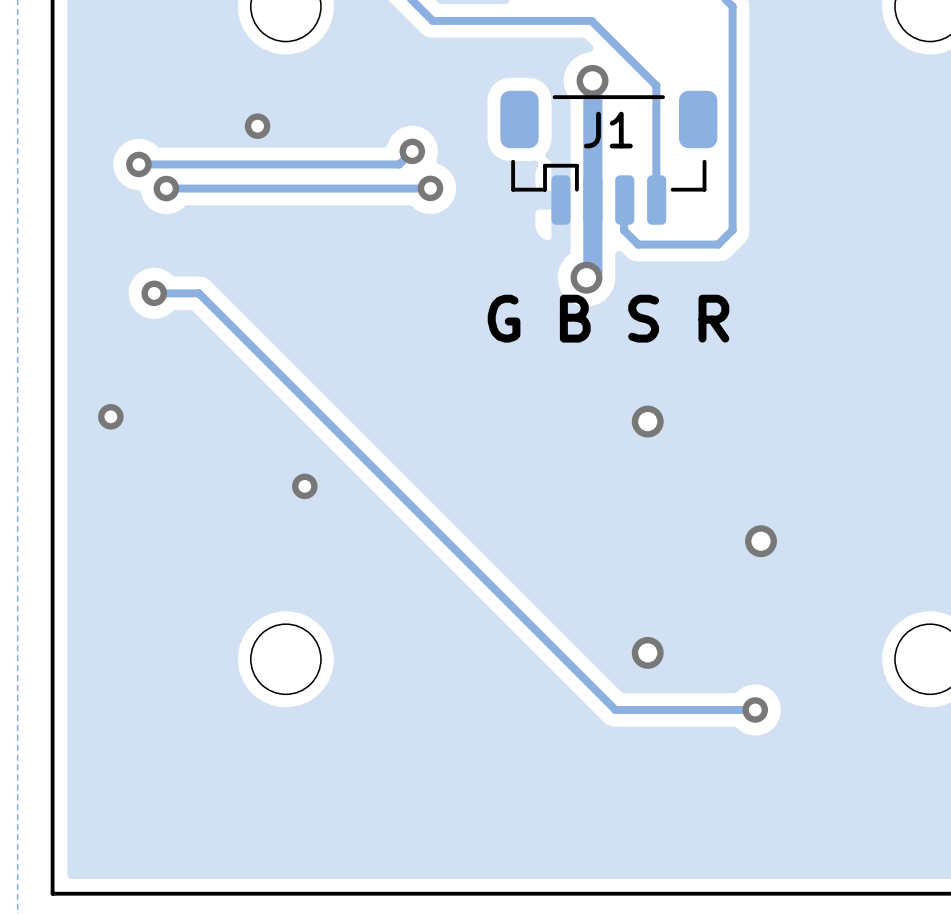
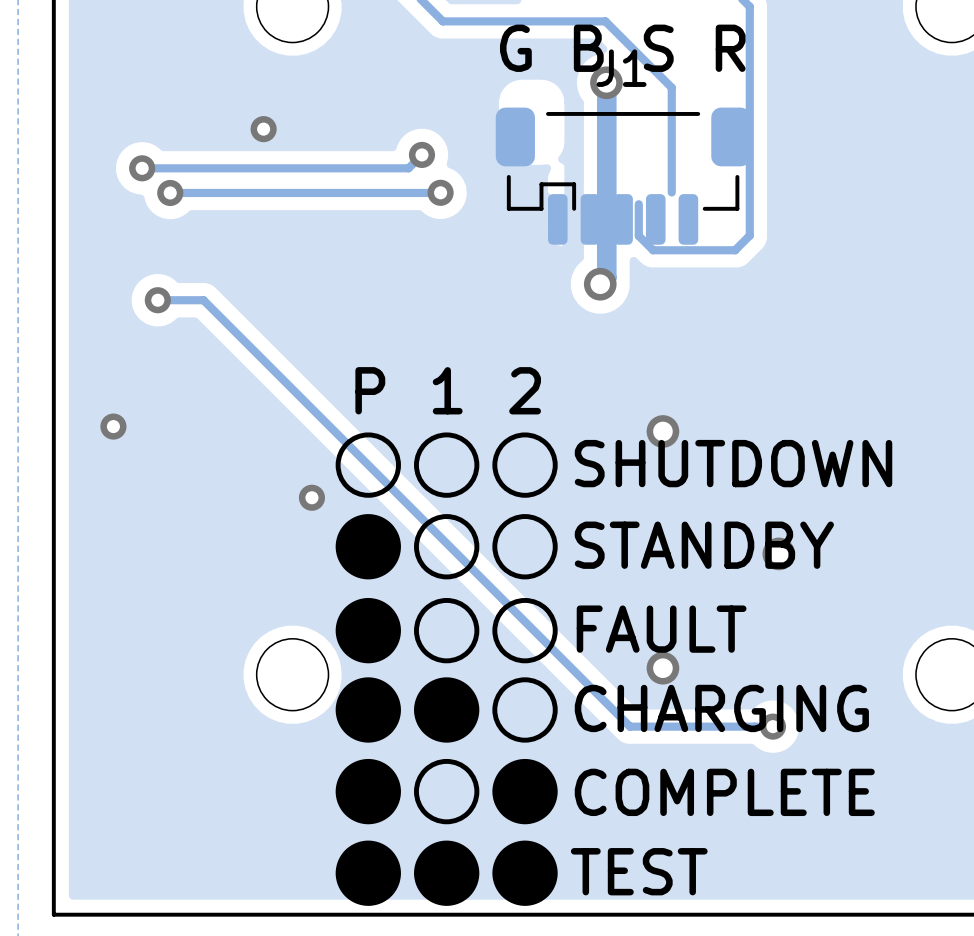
J1 footprint: [500, 90, 718, 225] -> [495, 107, 751, 245]
J1 name position: J1 (608, 130) -> J1 (621, 68)
text position: G B S R (608, 318) -> G B S R (622, 48)
text: none -> P (370, 390)
text: none -> 1 (447, 390)
text: none -> 2 (525, 390)
drawing: none -> [335, 432, 558, 906]
text: none -> SHUTDOWN (733, 463)
text: none -> STANDBY (704, 545)
text: none -> FAULT (661, 629)
text: none -> CHARGING (721, 708)
text: none -> COMPLETE (724, 792)
text: none -> TEST (639, 871)

